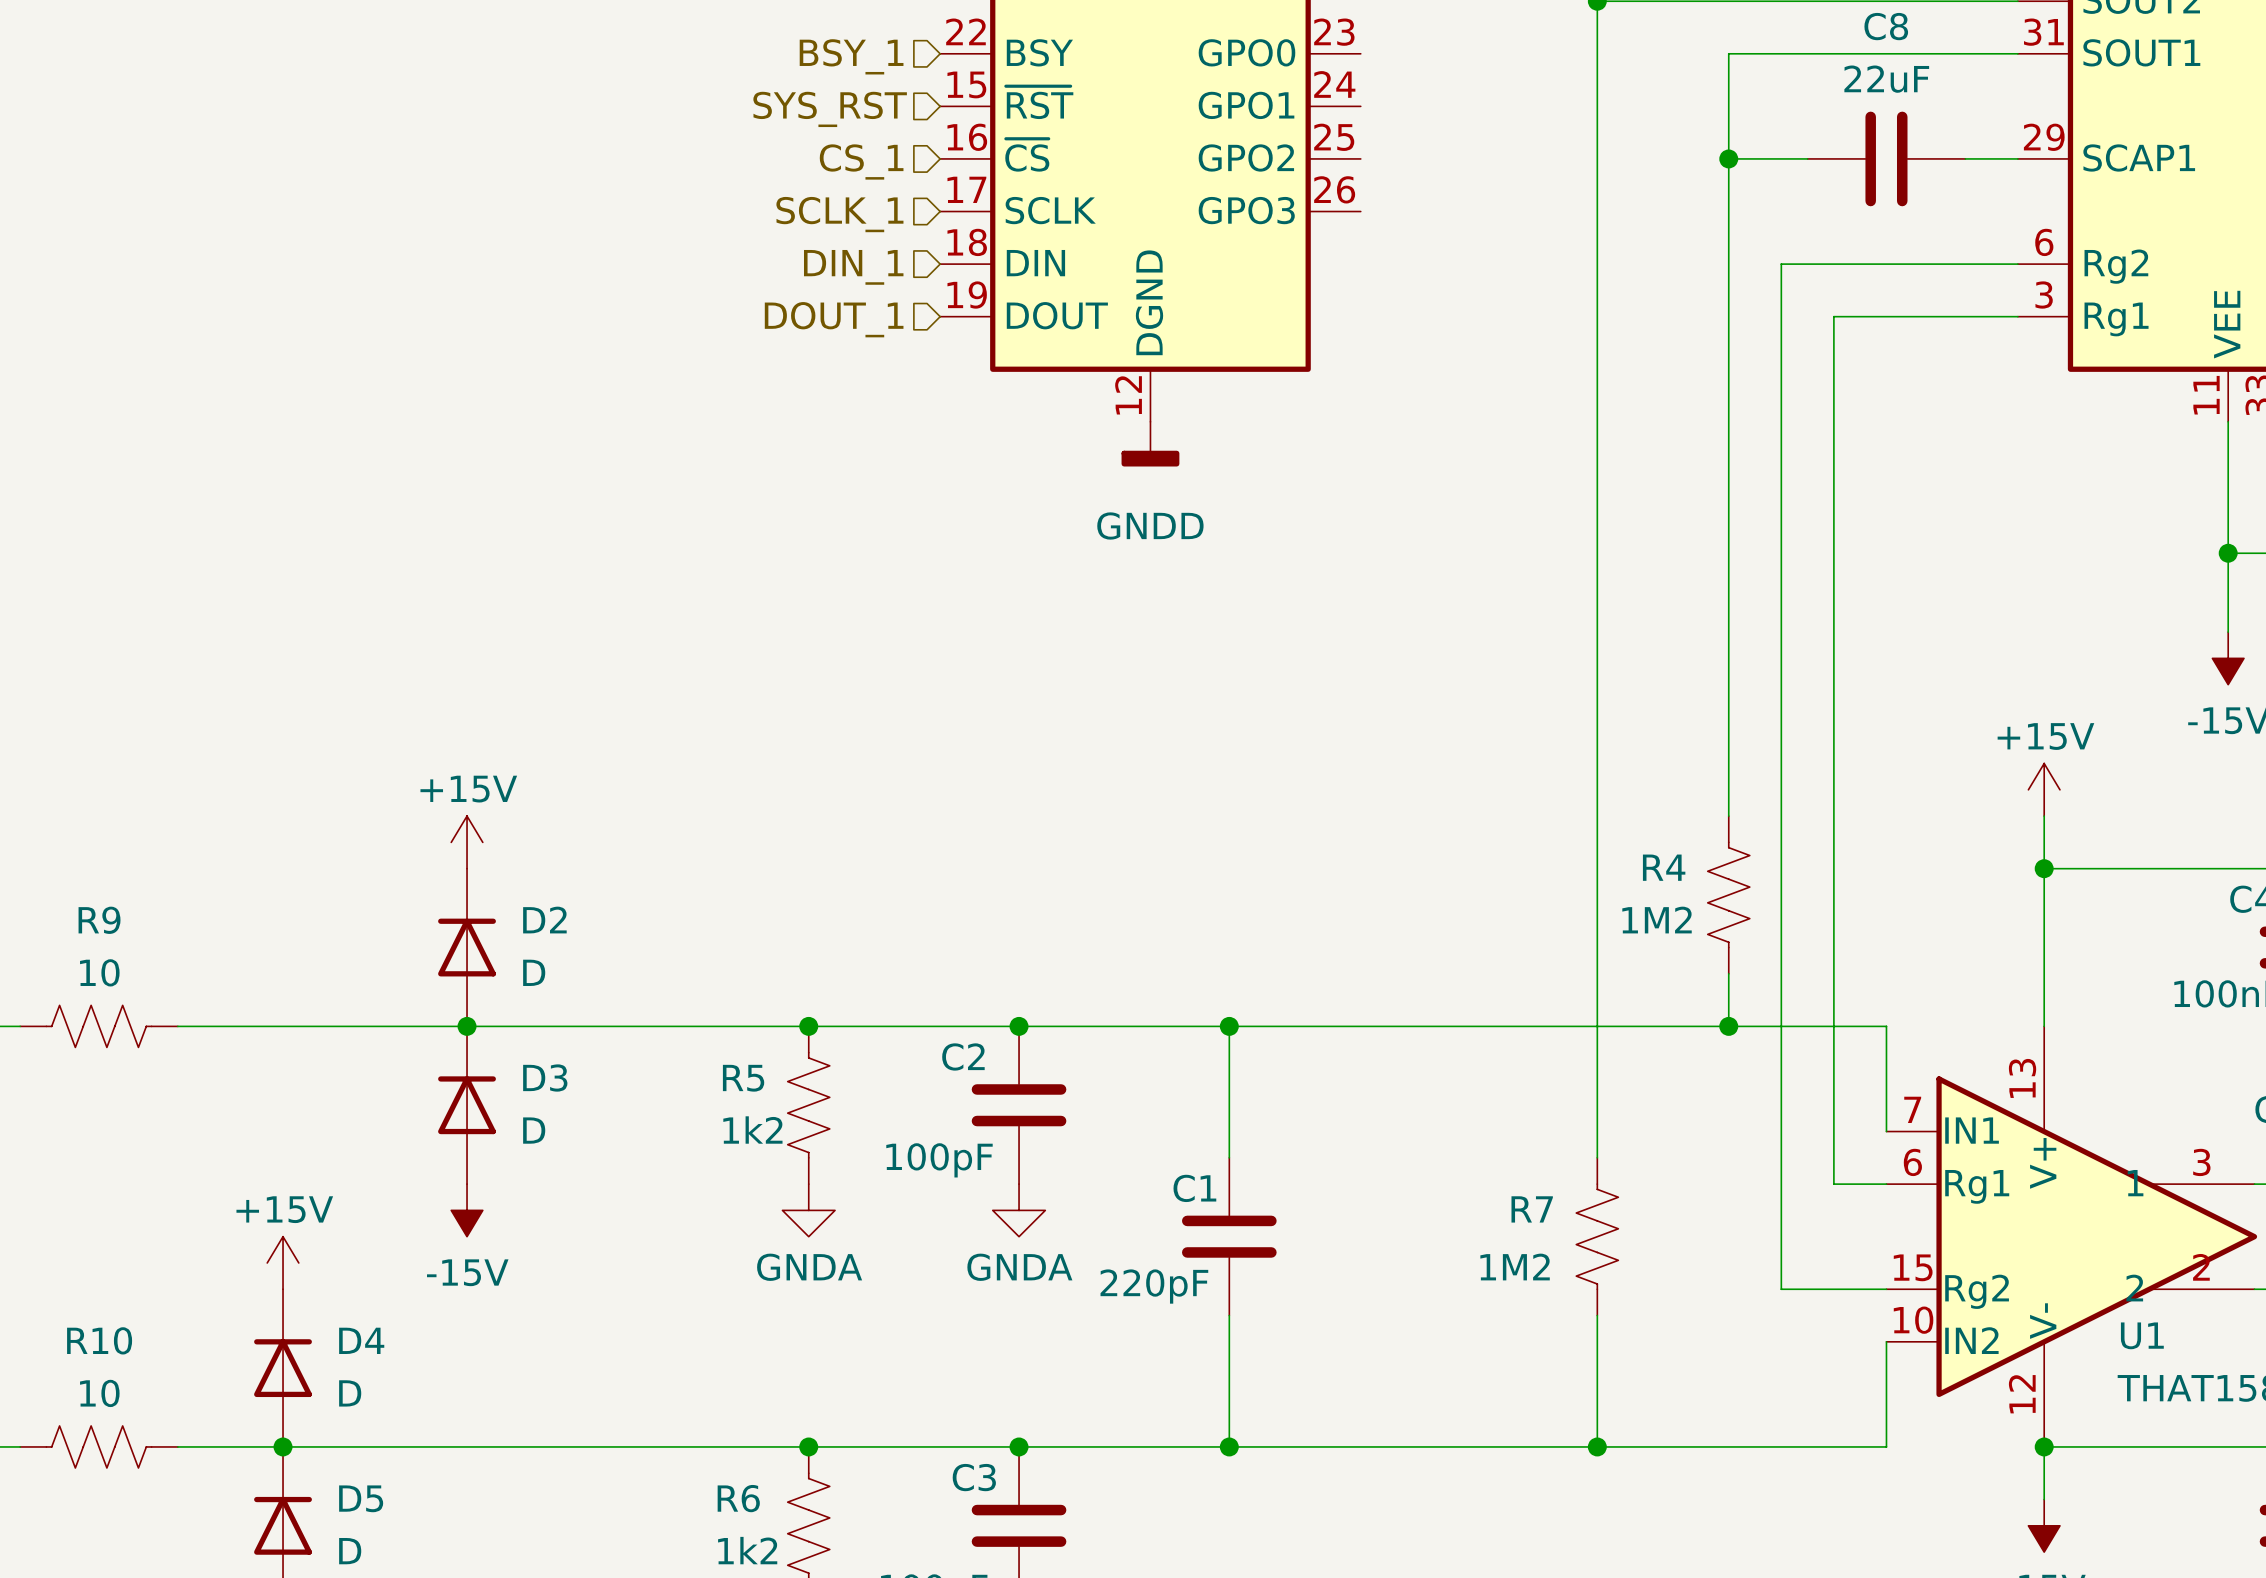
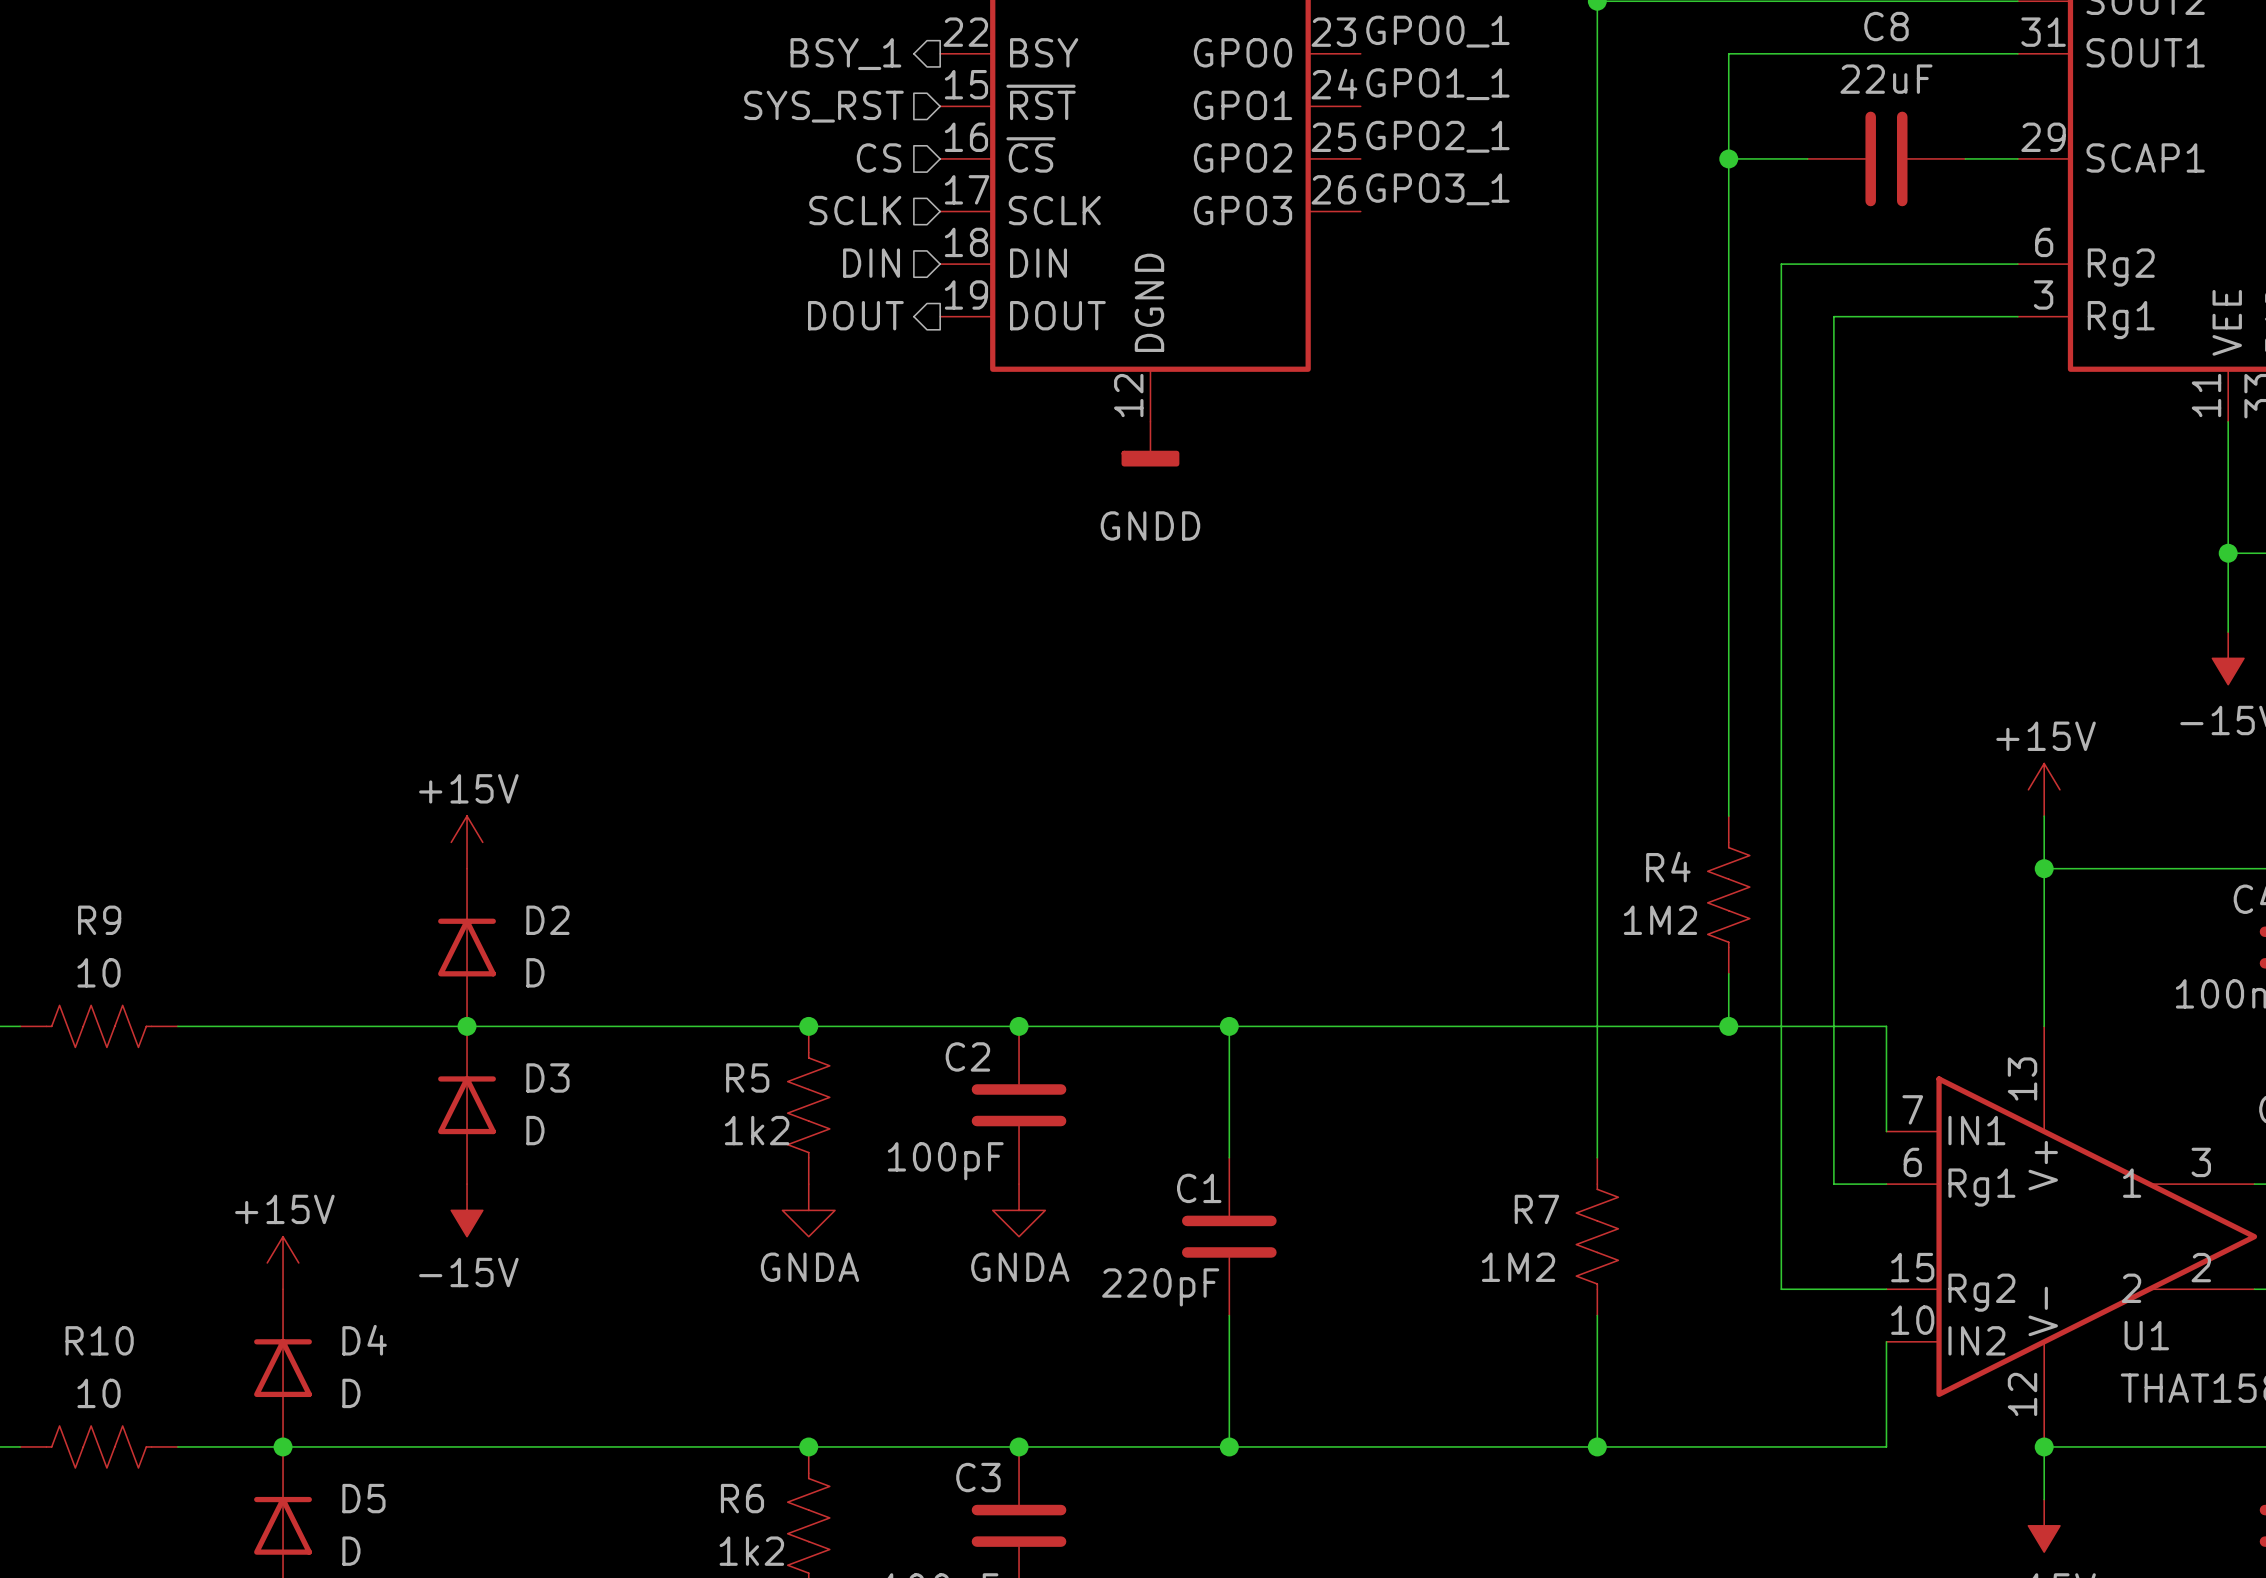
label: none -> GPO0_1 (1437, 31)
hierarchical label shape: input (851, 56) -> output (845, 54)
label: none -> GPO1_1 (1437, 84)
label: none -> GPO2_1 (1437, 136)
hierarchical label: CS_1 (861, 161) -> CS (879, 157)
label: none -> GPO3_1 (1437, 189)
hierarchical label: SCLK_1 (839, 214) -> SCLK (855, 210)
hierarchical label: DIN_1 (853, 267) -> DIN (871, 263)
hierarchical label shape: input (834, 319) -> output (855, 315)
hierarchical label: DOUT_1 (834, 319) -> DOUT (855, 315)

